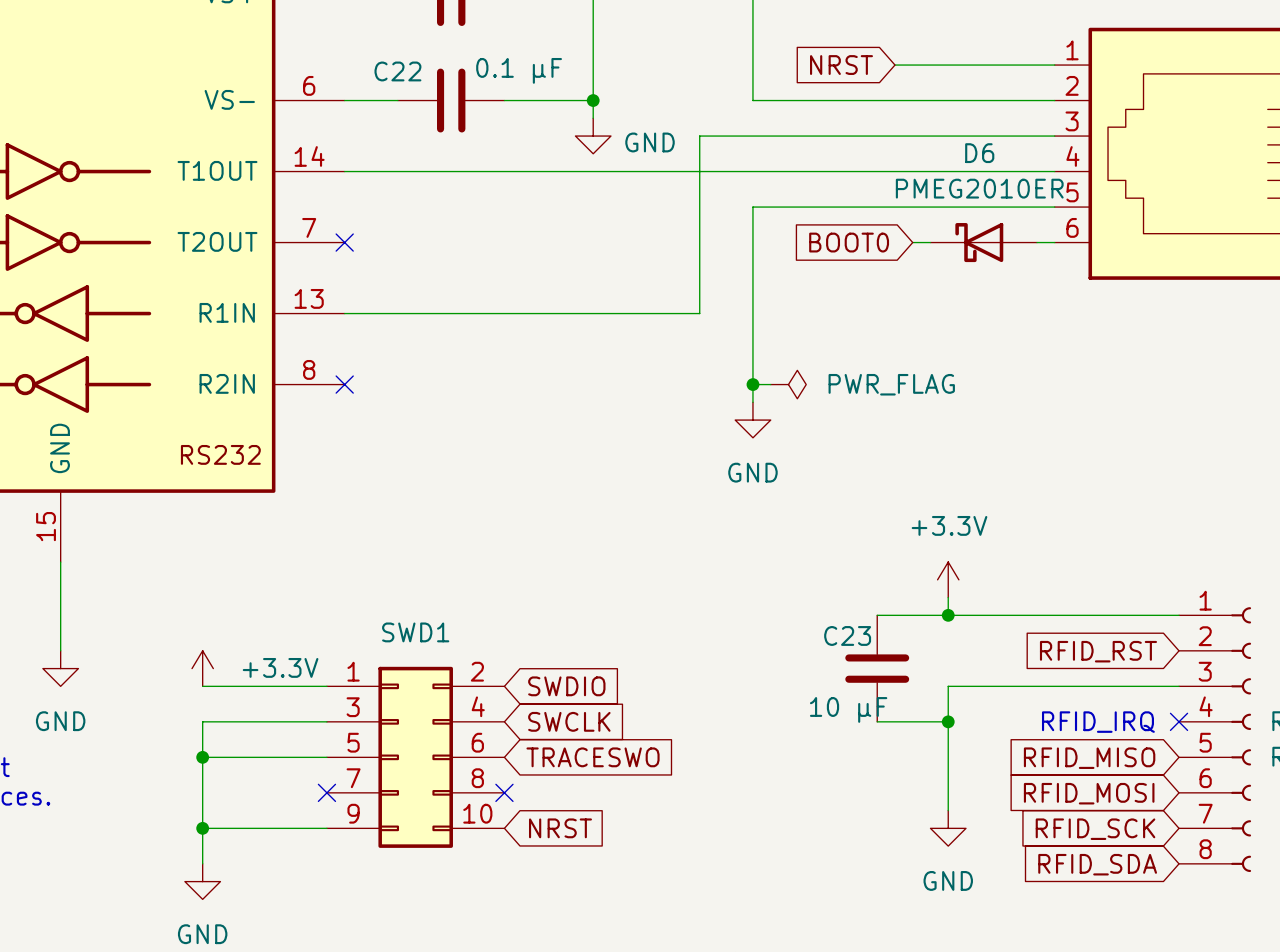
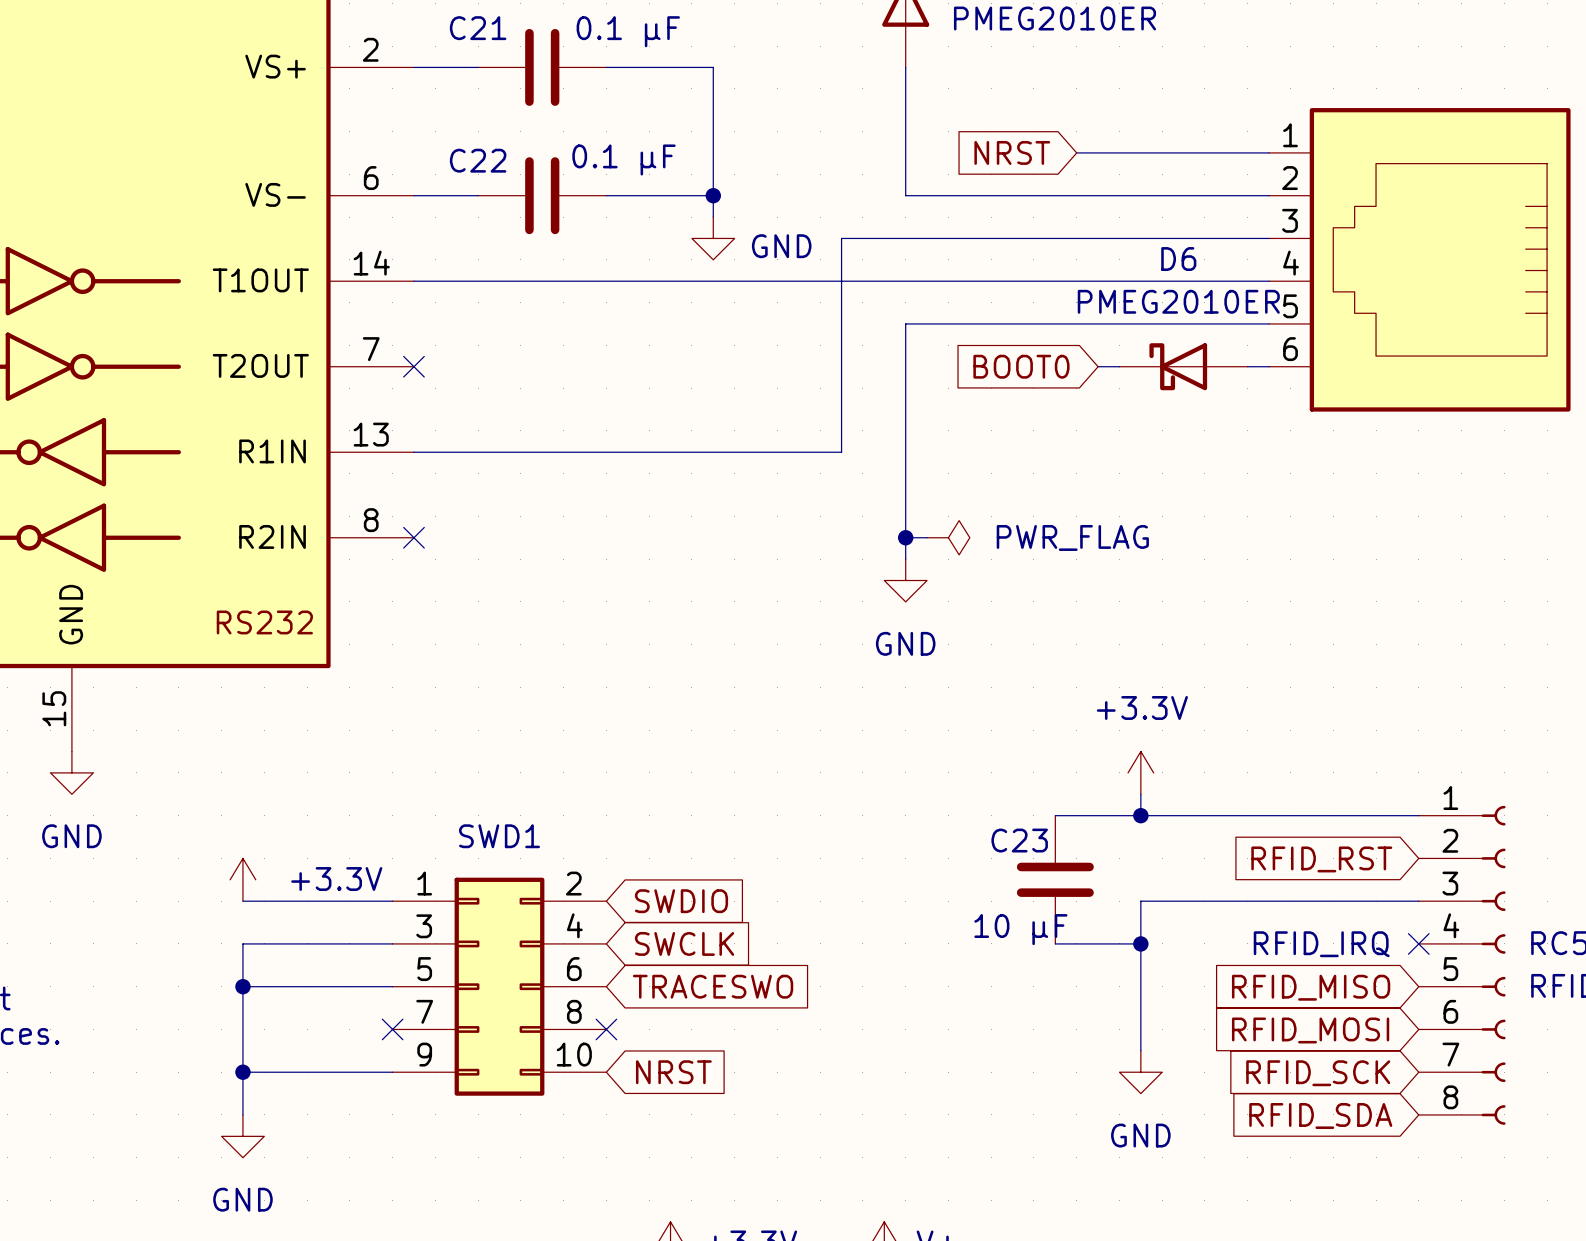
wire: (60, 562) (60, 650) -> none
power symbol position: GND (60, 668) -> GND (71, 772)

